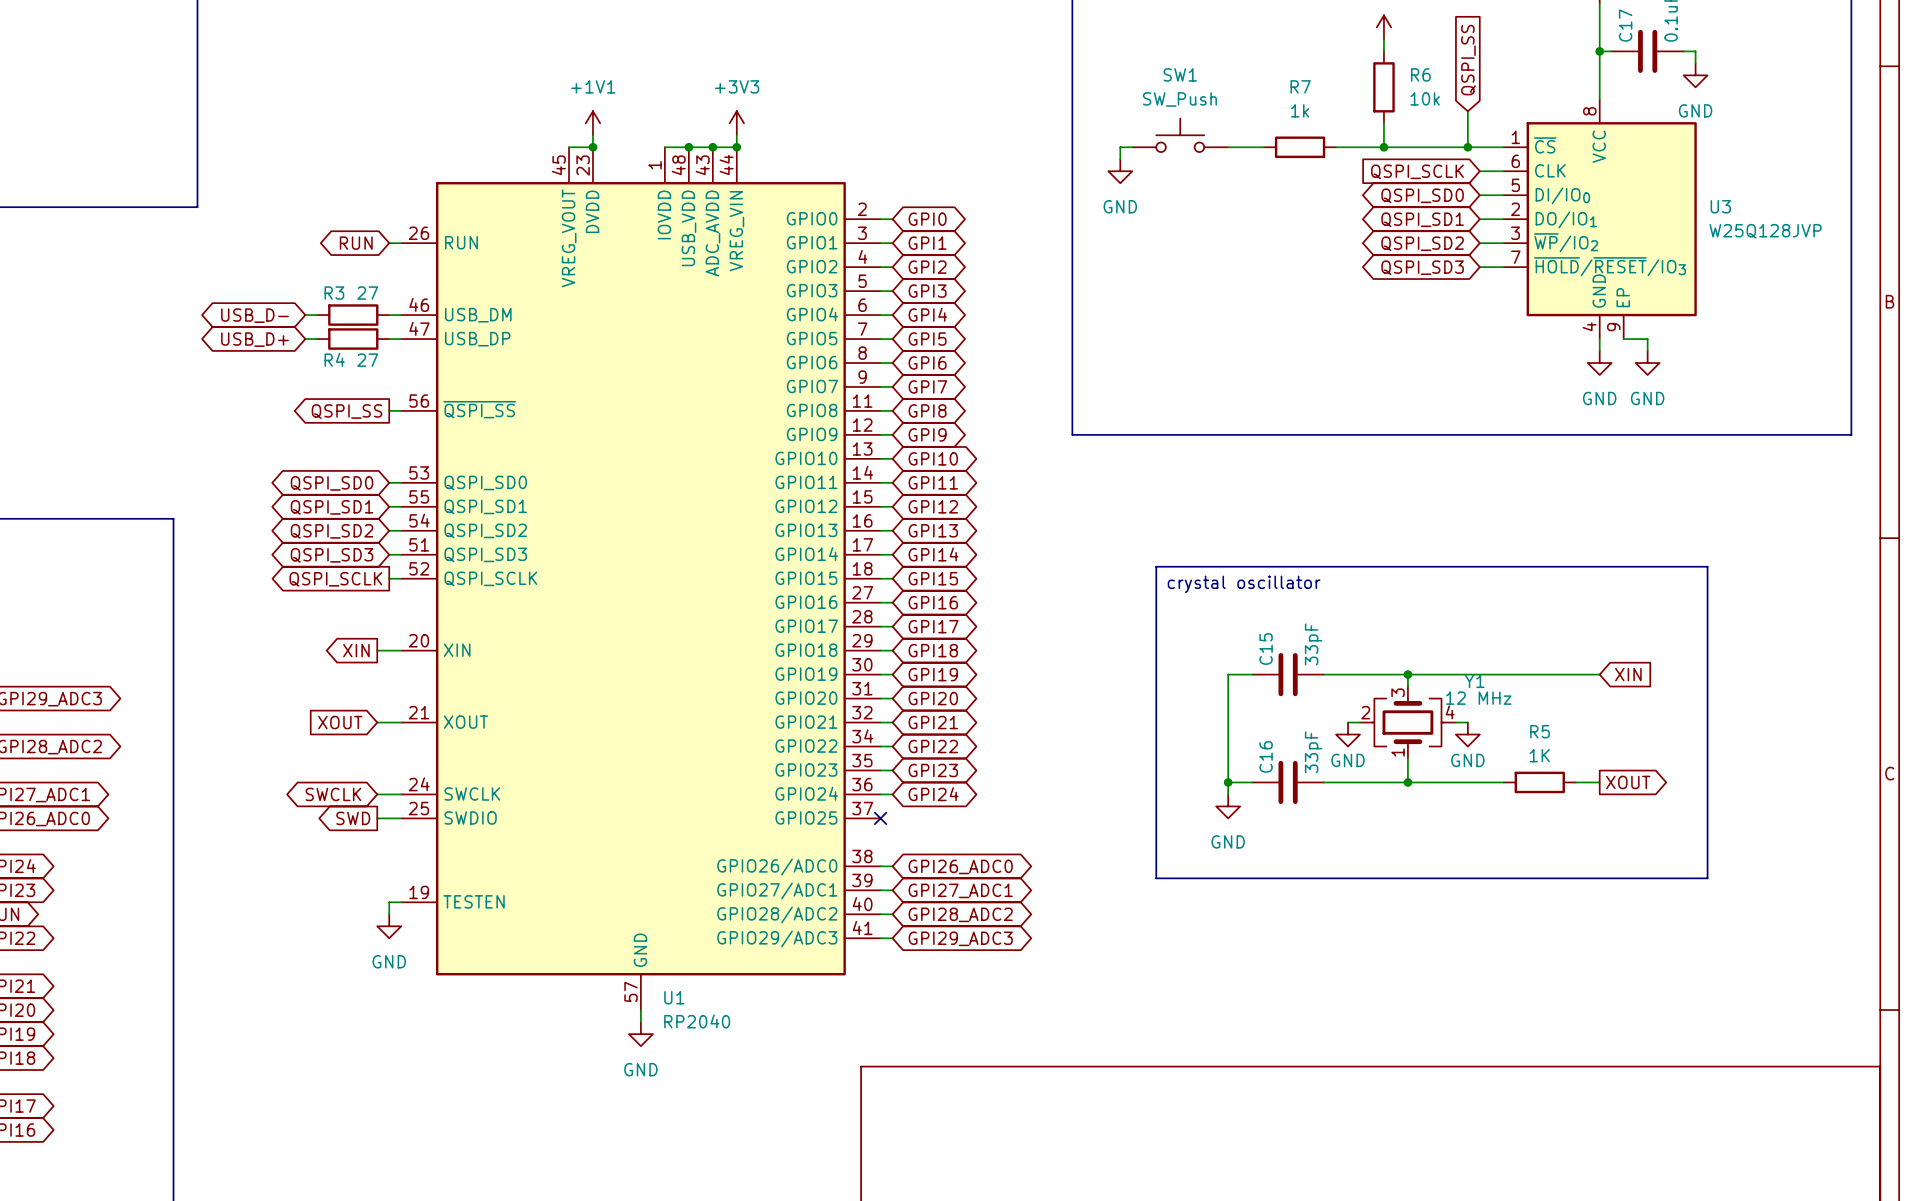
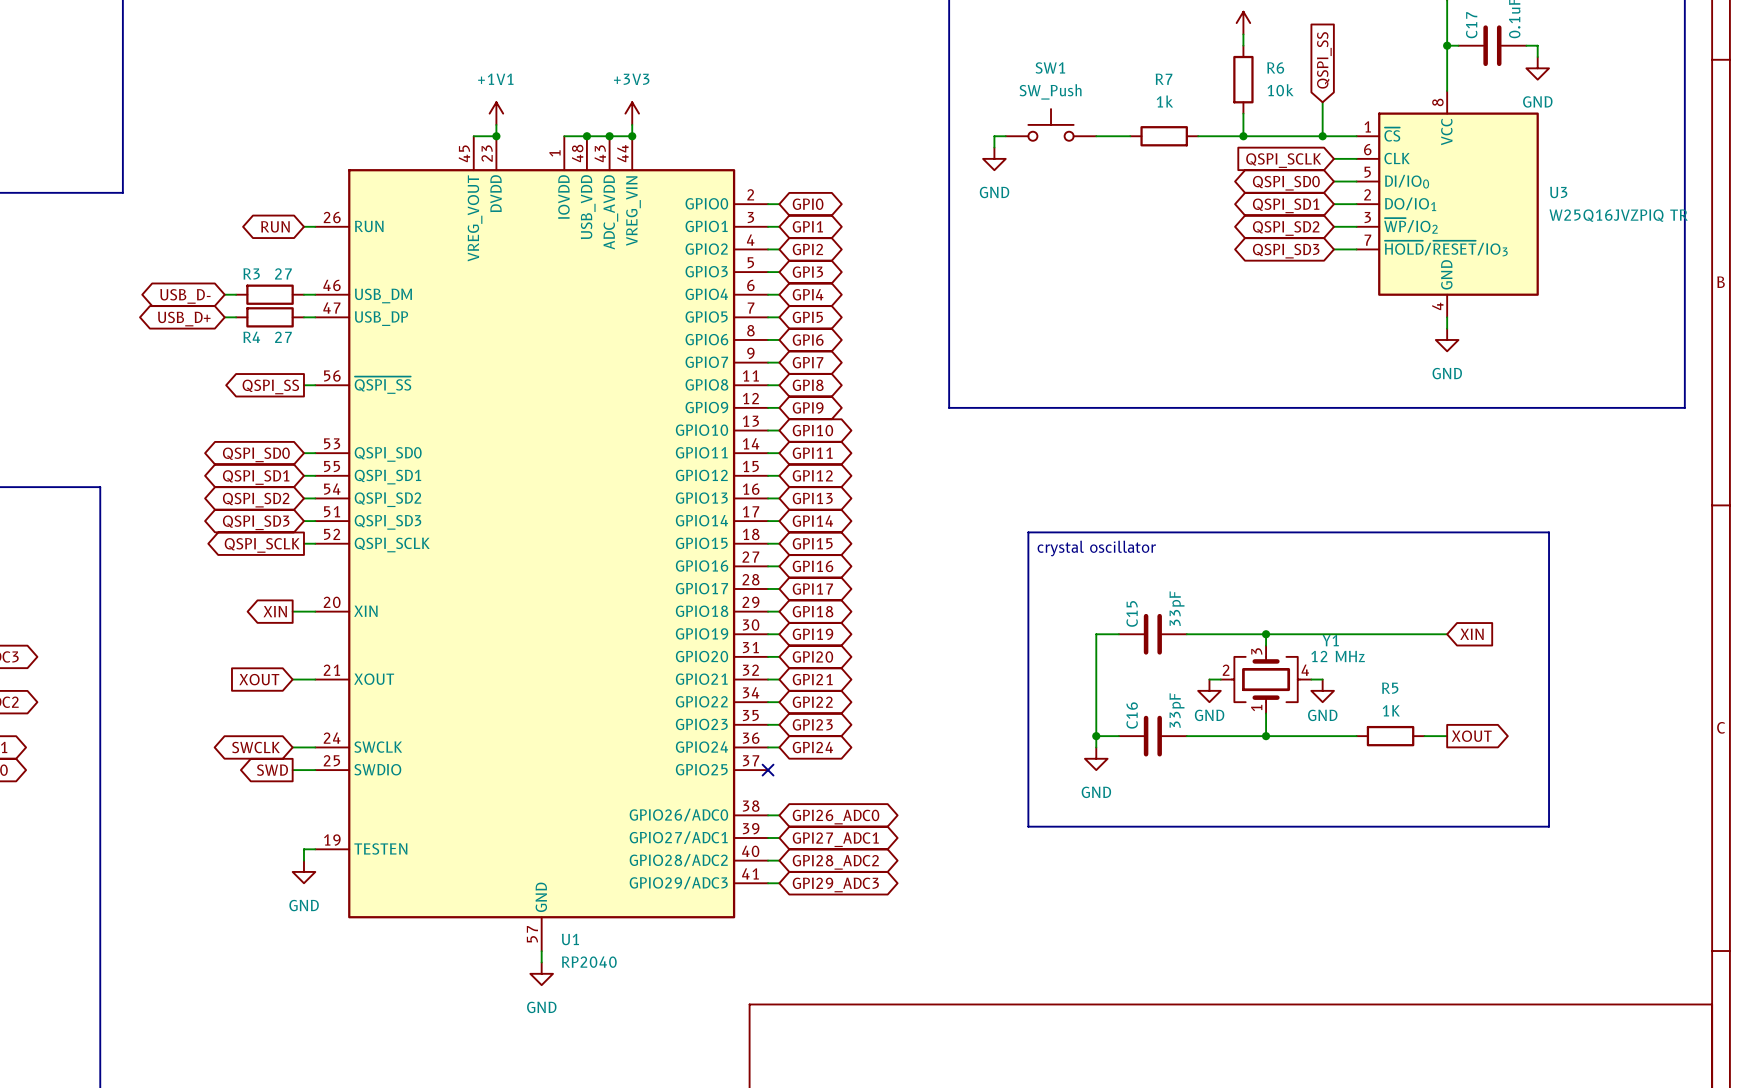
U3 symbol: [1503, 99, 1697, 340] -> [1356, 90, 1539, 318]
U3 value: W25Q128JVP (1765, 231) -> W25Q16JVZPIQ TR (1618, 215)
wire: (1623, 339) (1647, 339) (1647, 351) -> none
power symbol: GND (1647, 363) -> none

